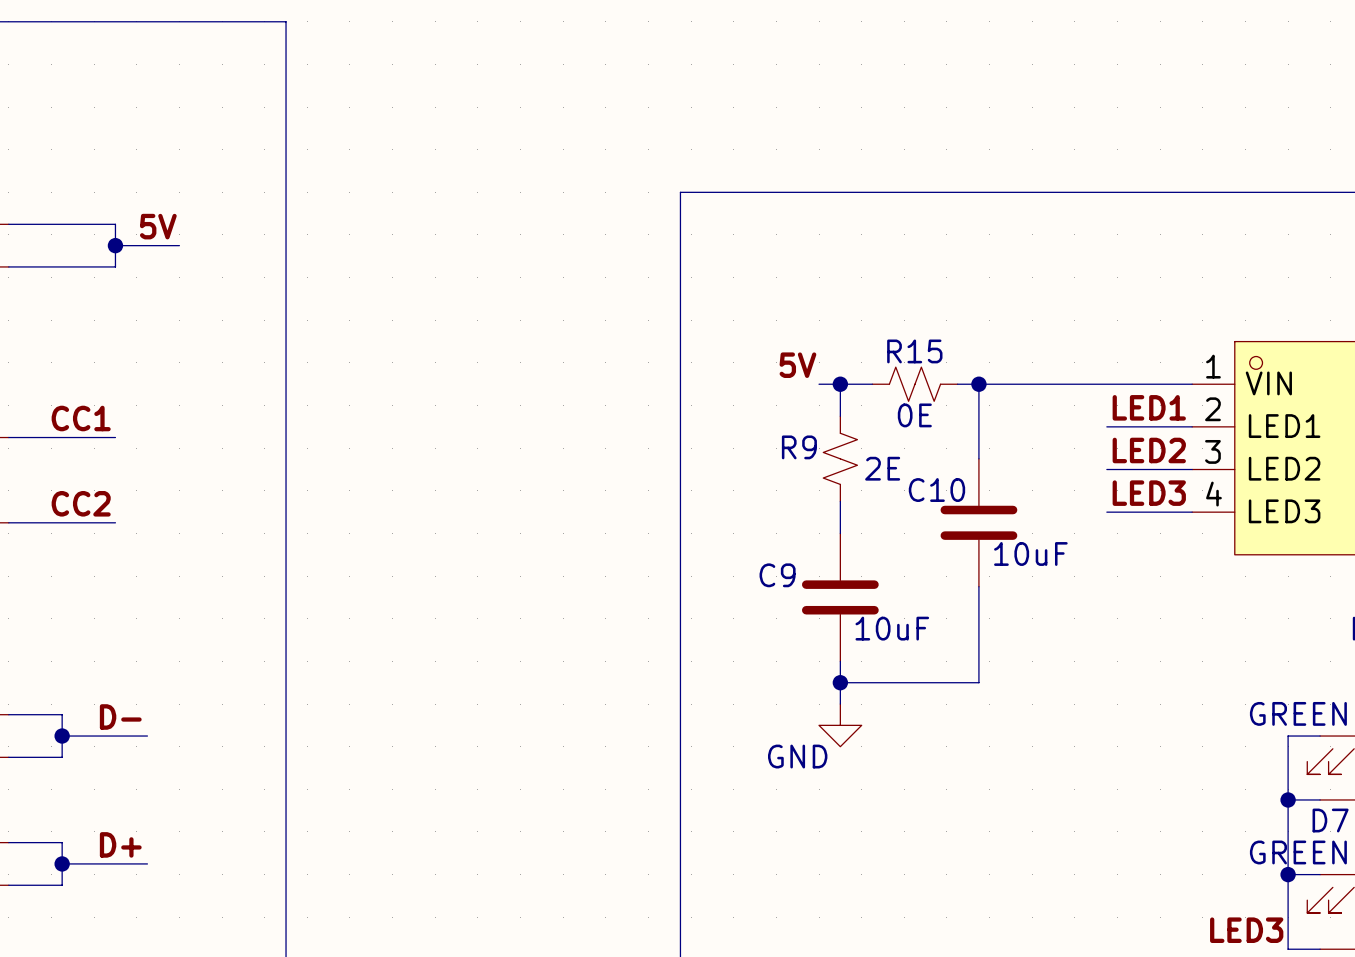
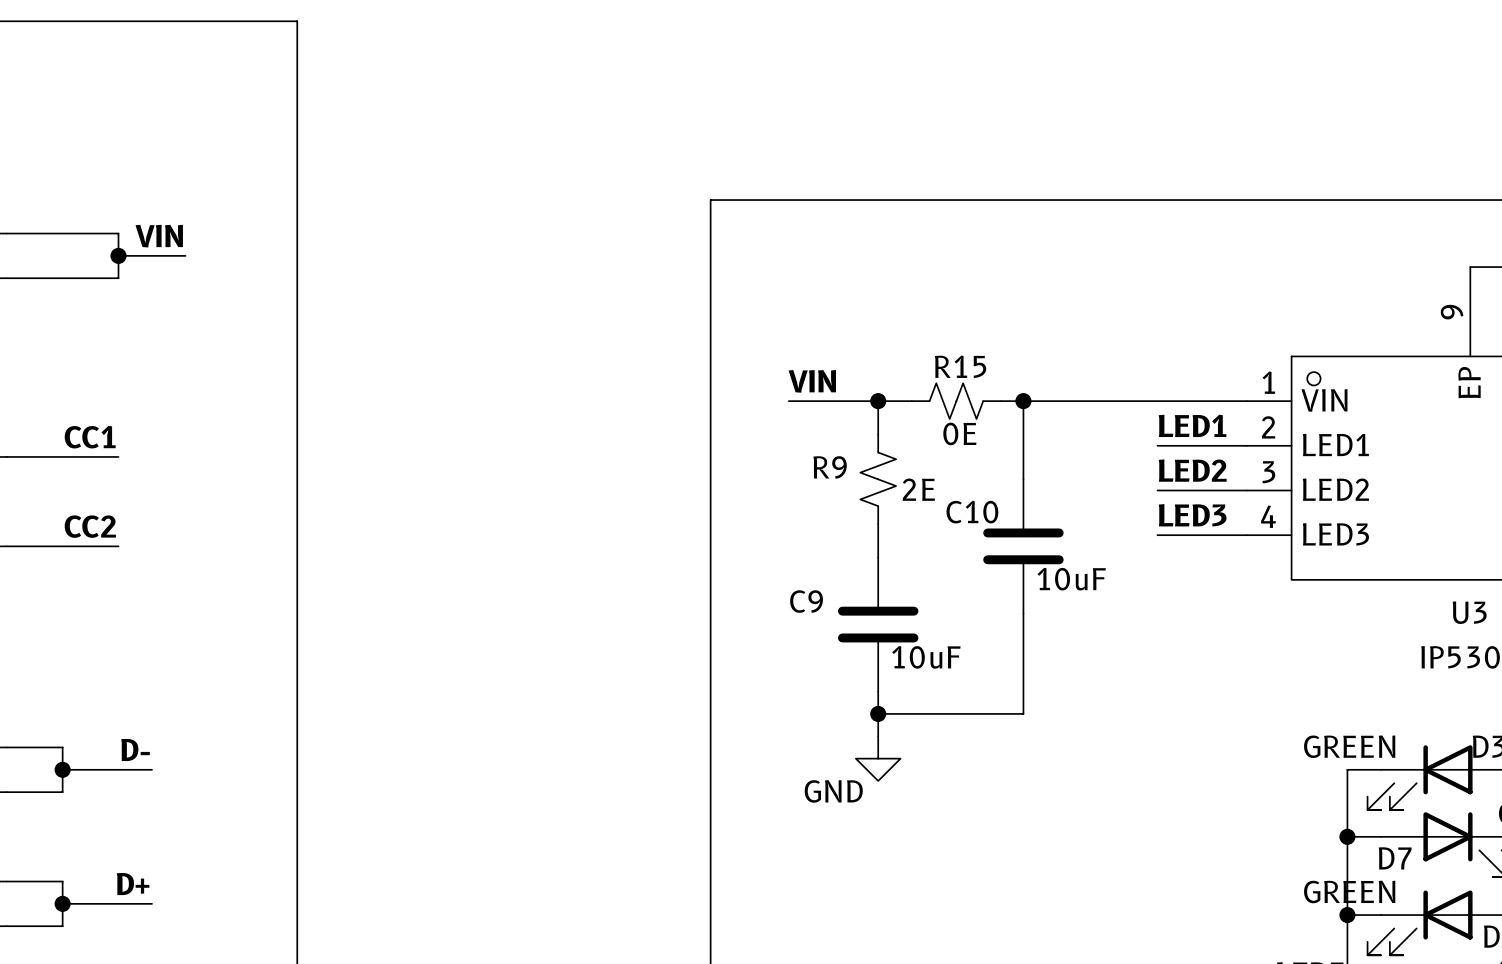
label: 5V (158, 226) -> VIN (159, 236)
label: none -> VIN (812, 381)
label: 5V (797, 365) -> none
wire: none -> (788, 401) (855, 401)

